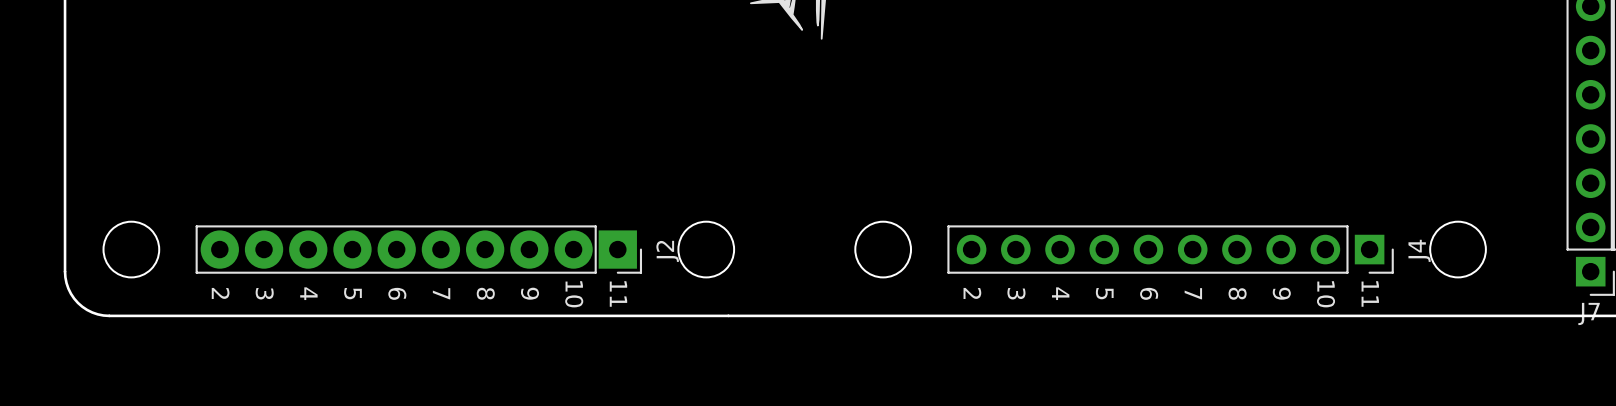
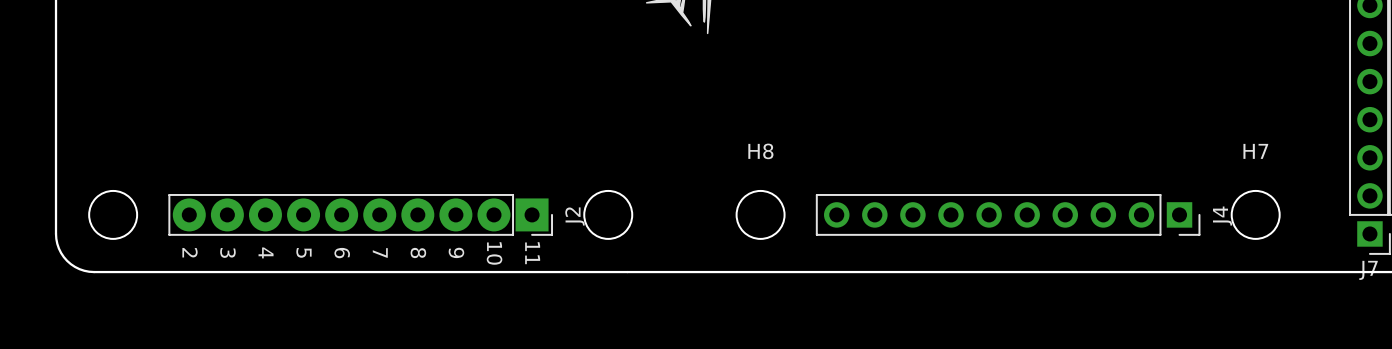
H8 name: none -> H8 (760, 151)
H7 name: none -> H7 (1255, 151)
text: 2 (972, 293) -> none
text: 3 (1016, 293) -> none
text: 4 (1060, 293) -> none
text: 5 (1104, 293) -> none
text: 6 (1149, 293) -> none
text: 7 (1193, 293) -> none
text: 8 (1237, 293) -> none
text: 9 (1281, 293) -> none
text: 11 (1370, 293) -> none
text: 10 (1326, 294) -> none

